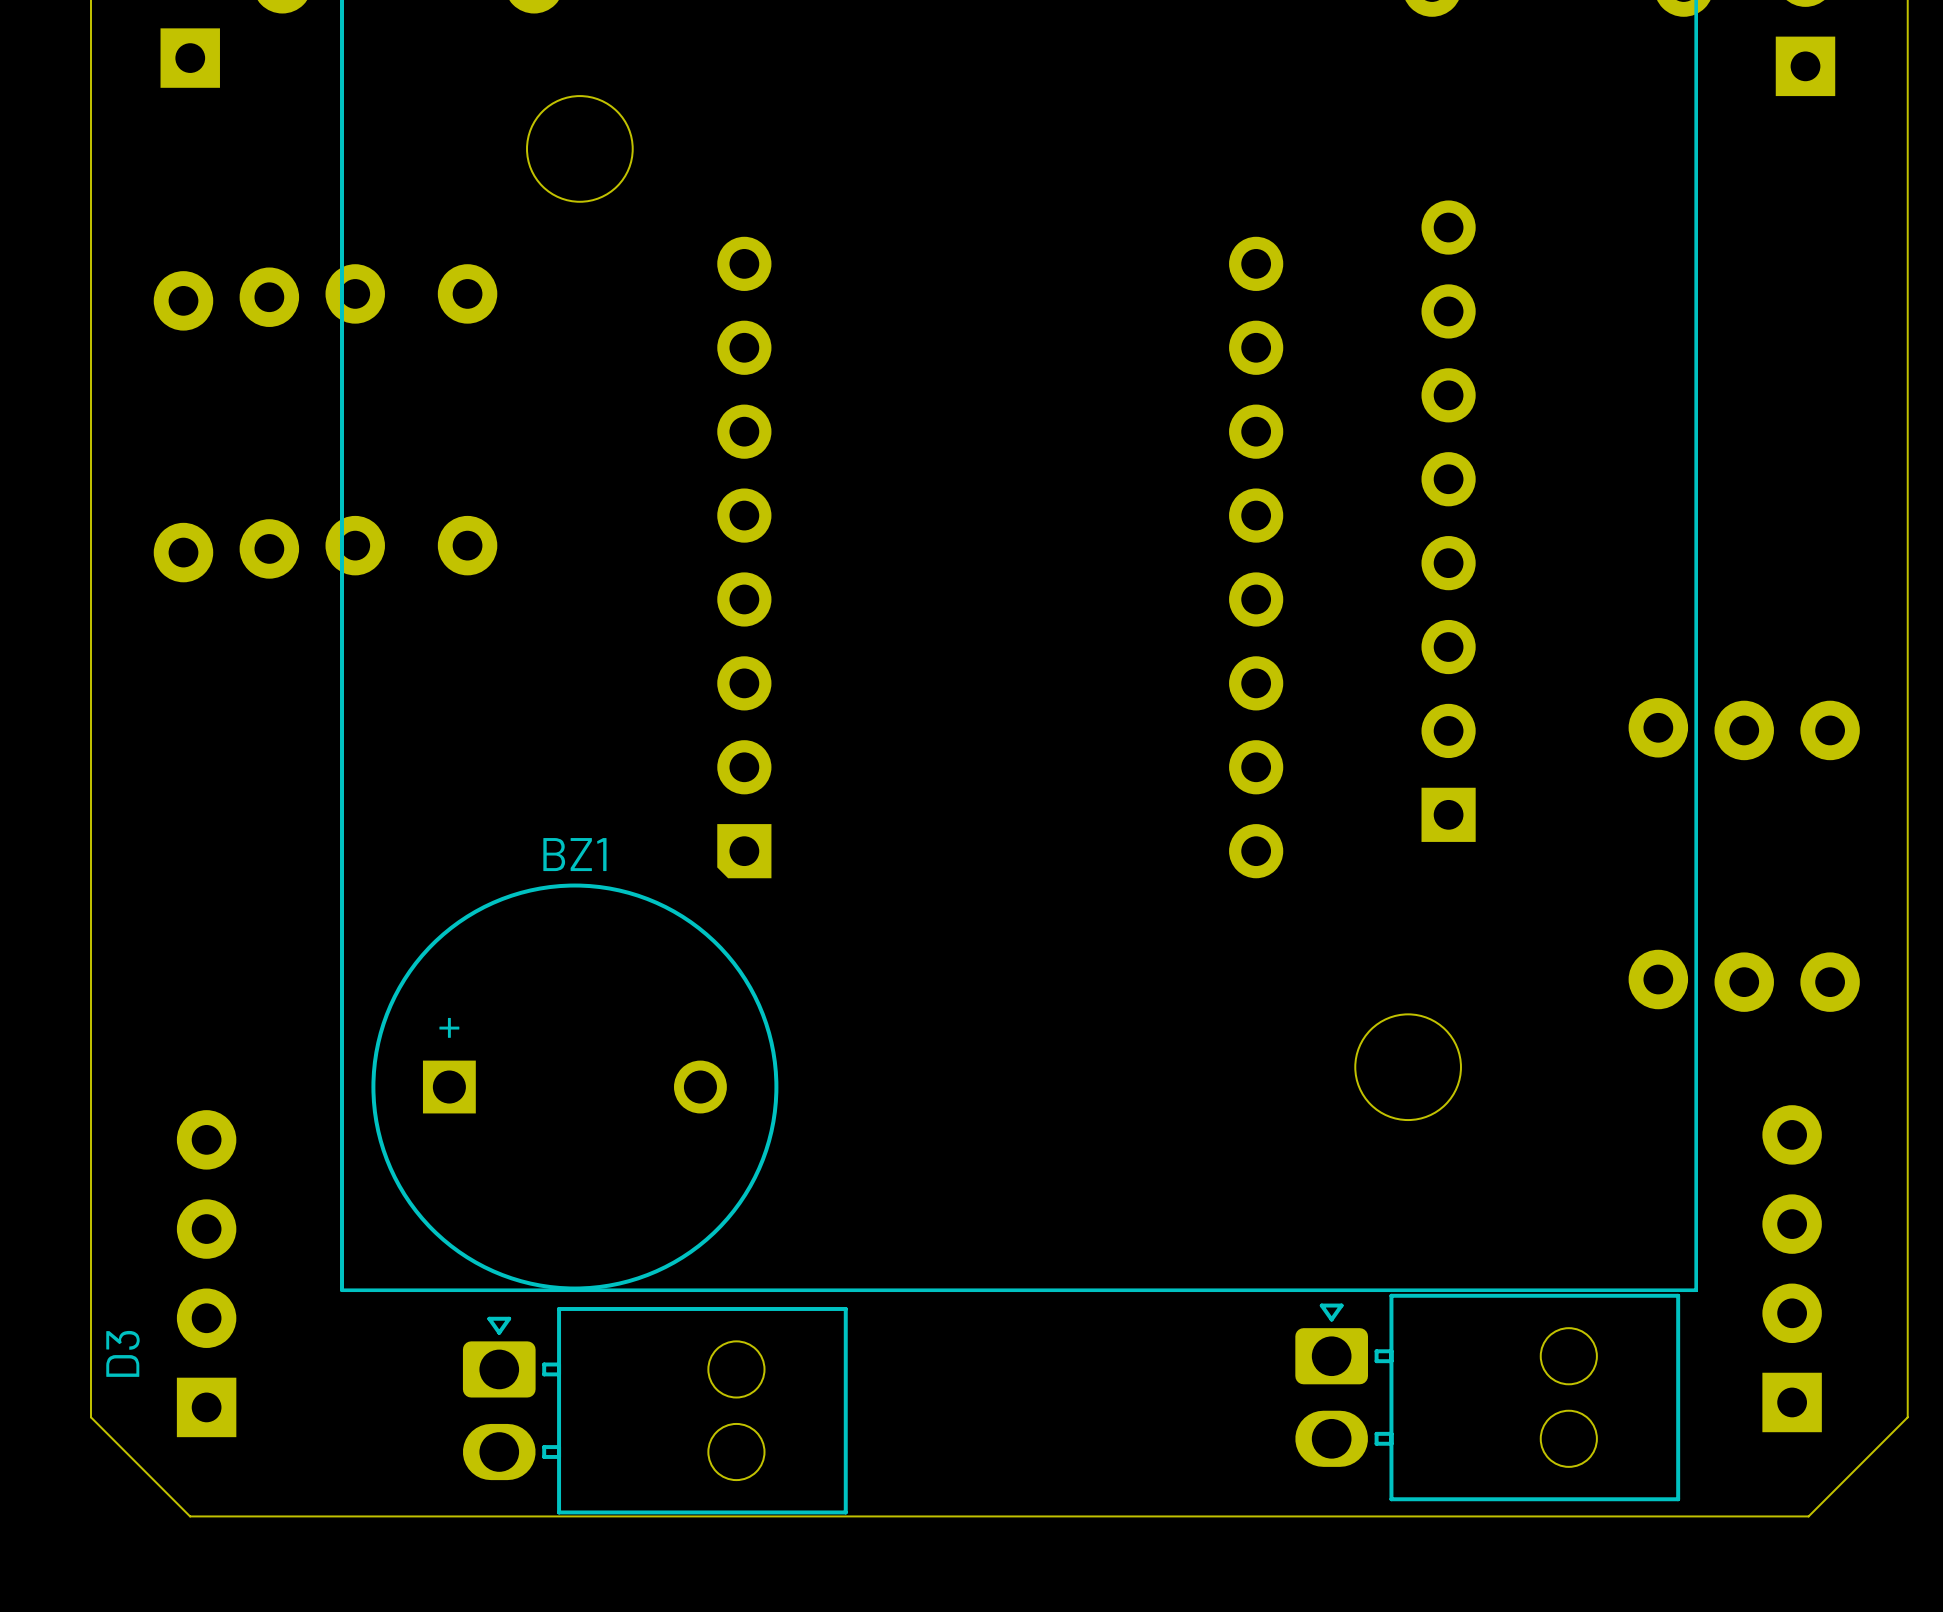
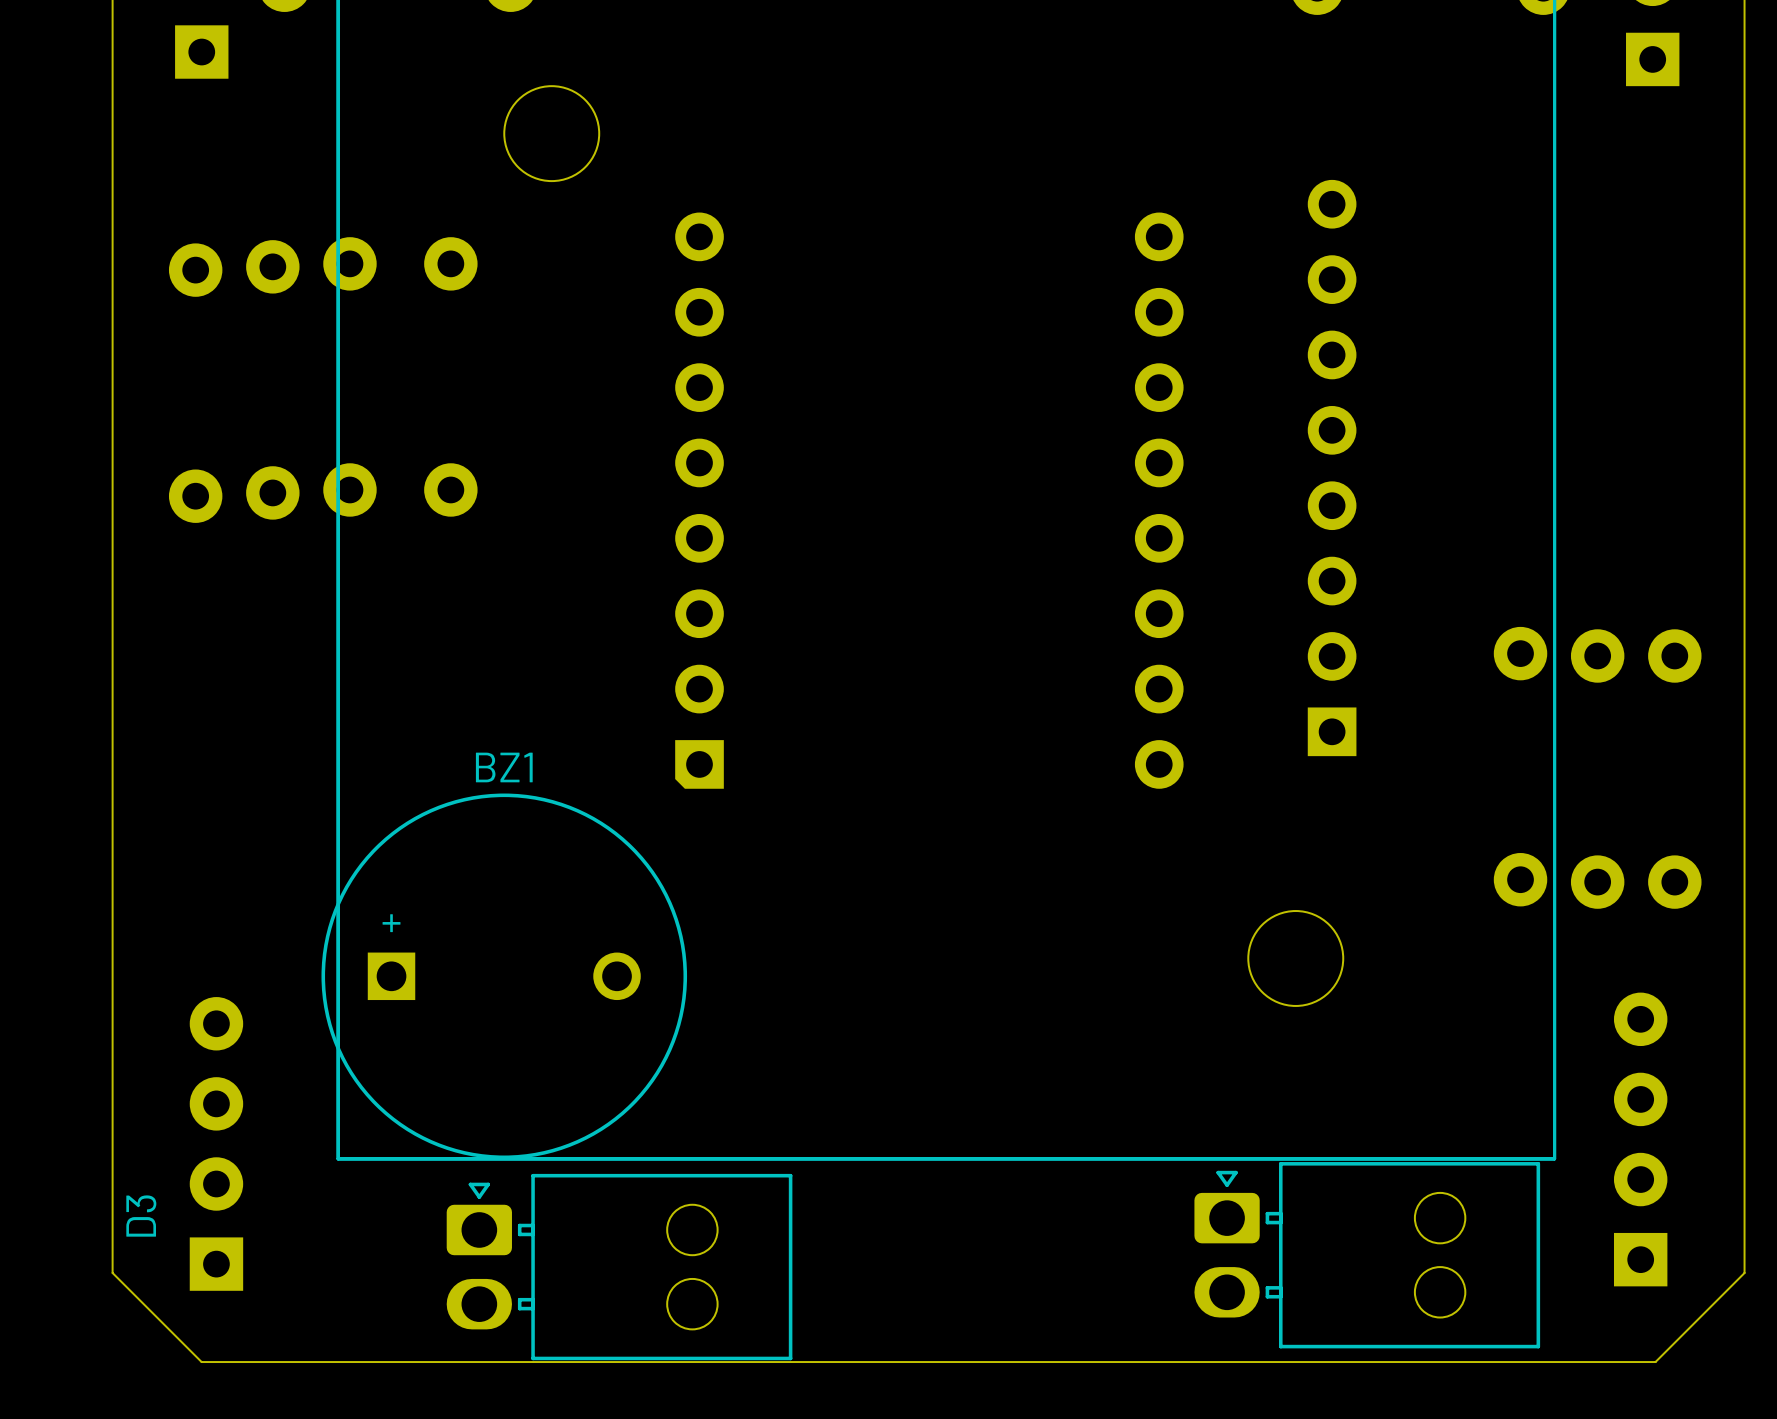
BZ1 position: (574, 1087) -> (504, 976)

